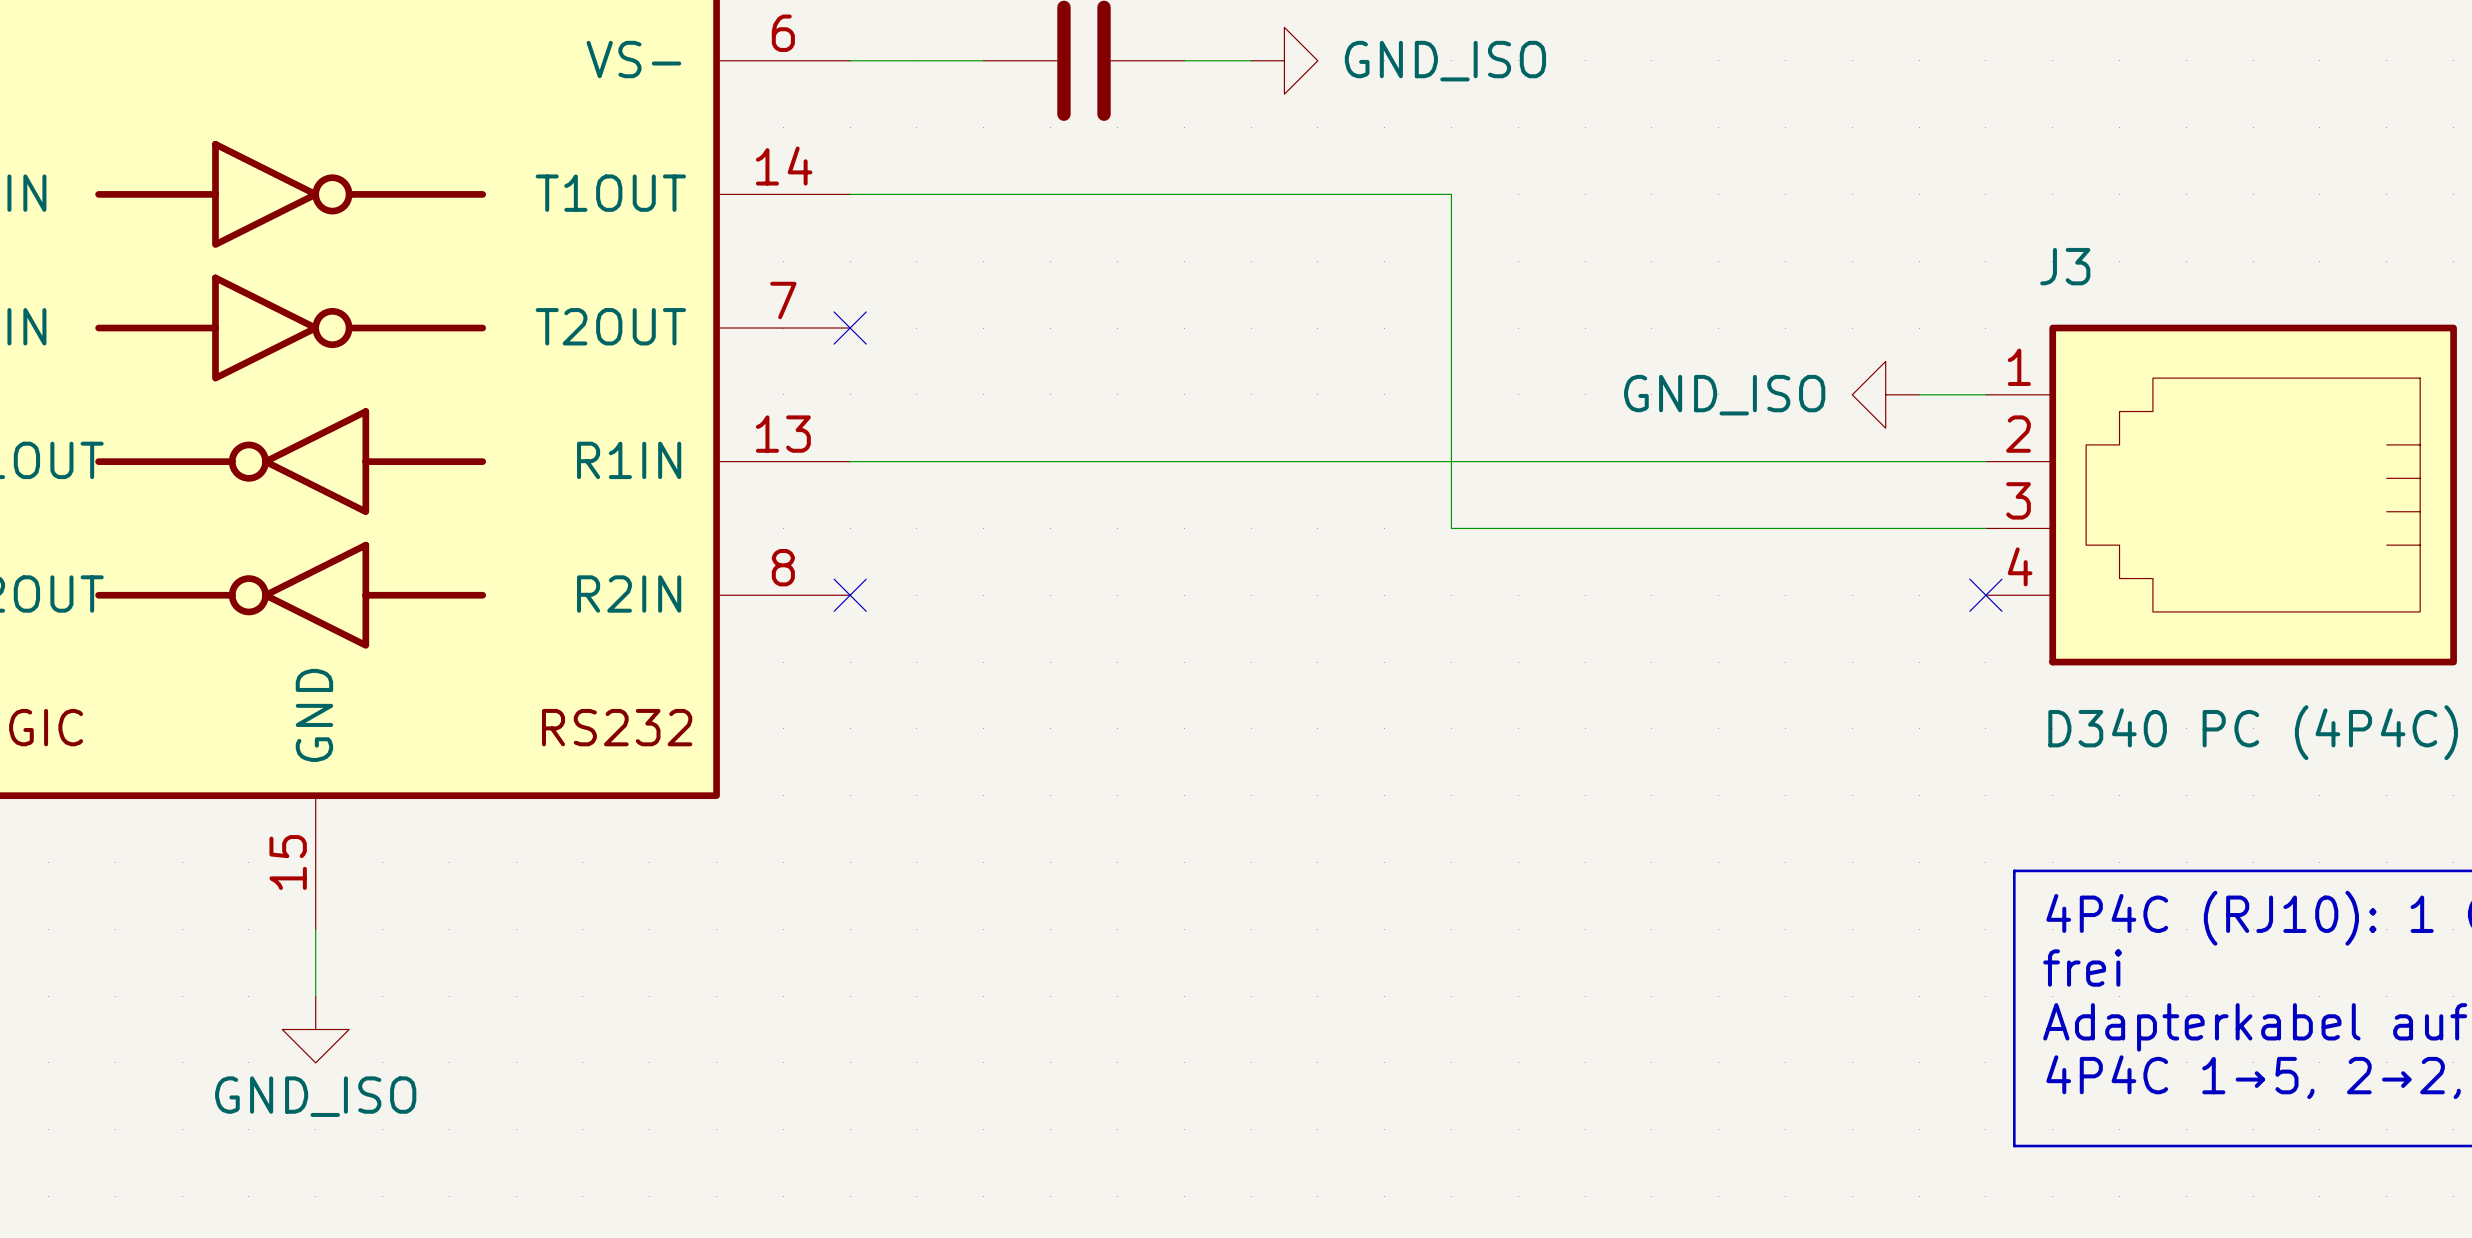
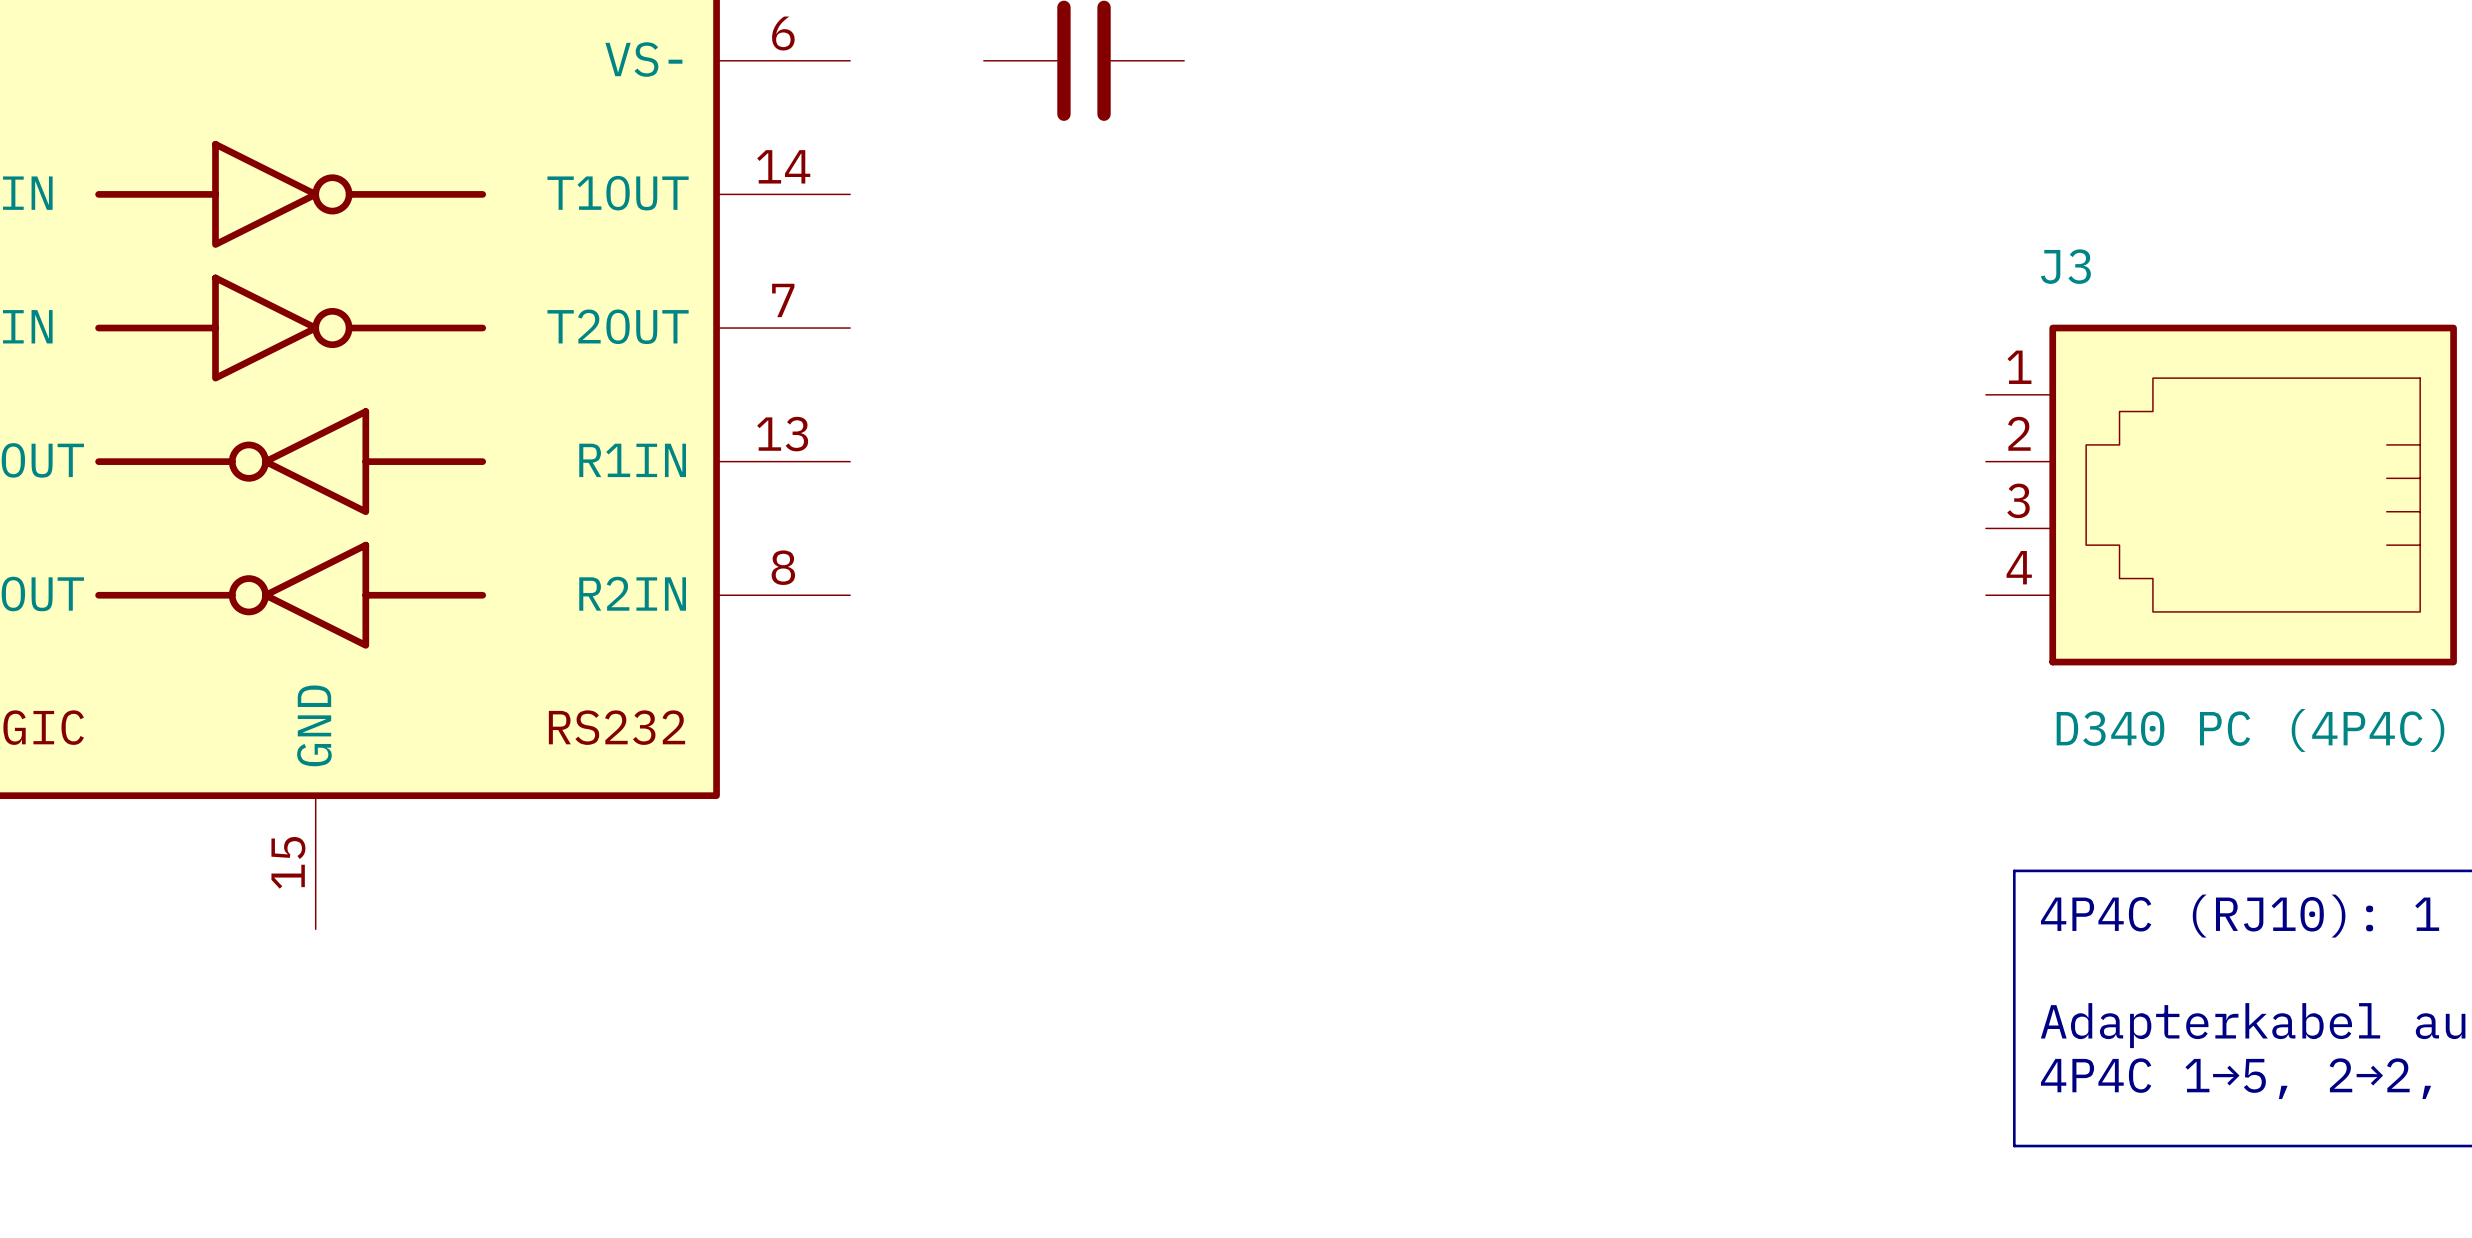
wire: (850, 60) (983, 60) -> none
wire: (1184, 60) (1251, 60) -> none
power symbol: GND_ISO (1284, 60) -> none
wire: (850, 194) (1451, 194) (1451, 528) (1985, 528) -> none
no-connect mark: (850, 328) -> none
power symbol: GND_ISO (1885, 394) -> none
wire: (1919, 394) (1985, 394) -> none
wire: (850, 461) (1985, 461) -> none
no-connect mark: (850, 595) -> none
no-connect mark: (1985, 595) -> none
wire: (315, 929) (315, 996) -> none
text: frei (2082, 968) -> none
power symbol: GND_ISO (315, 1029) -> none

